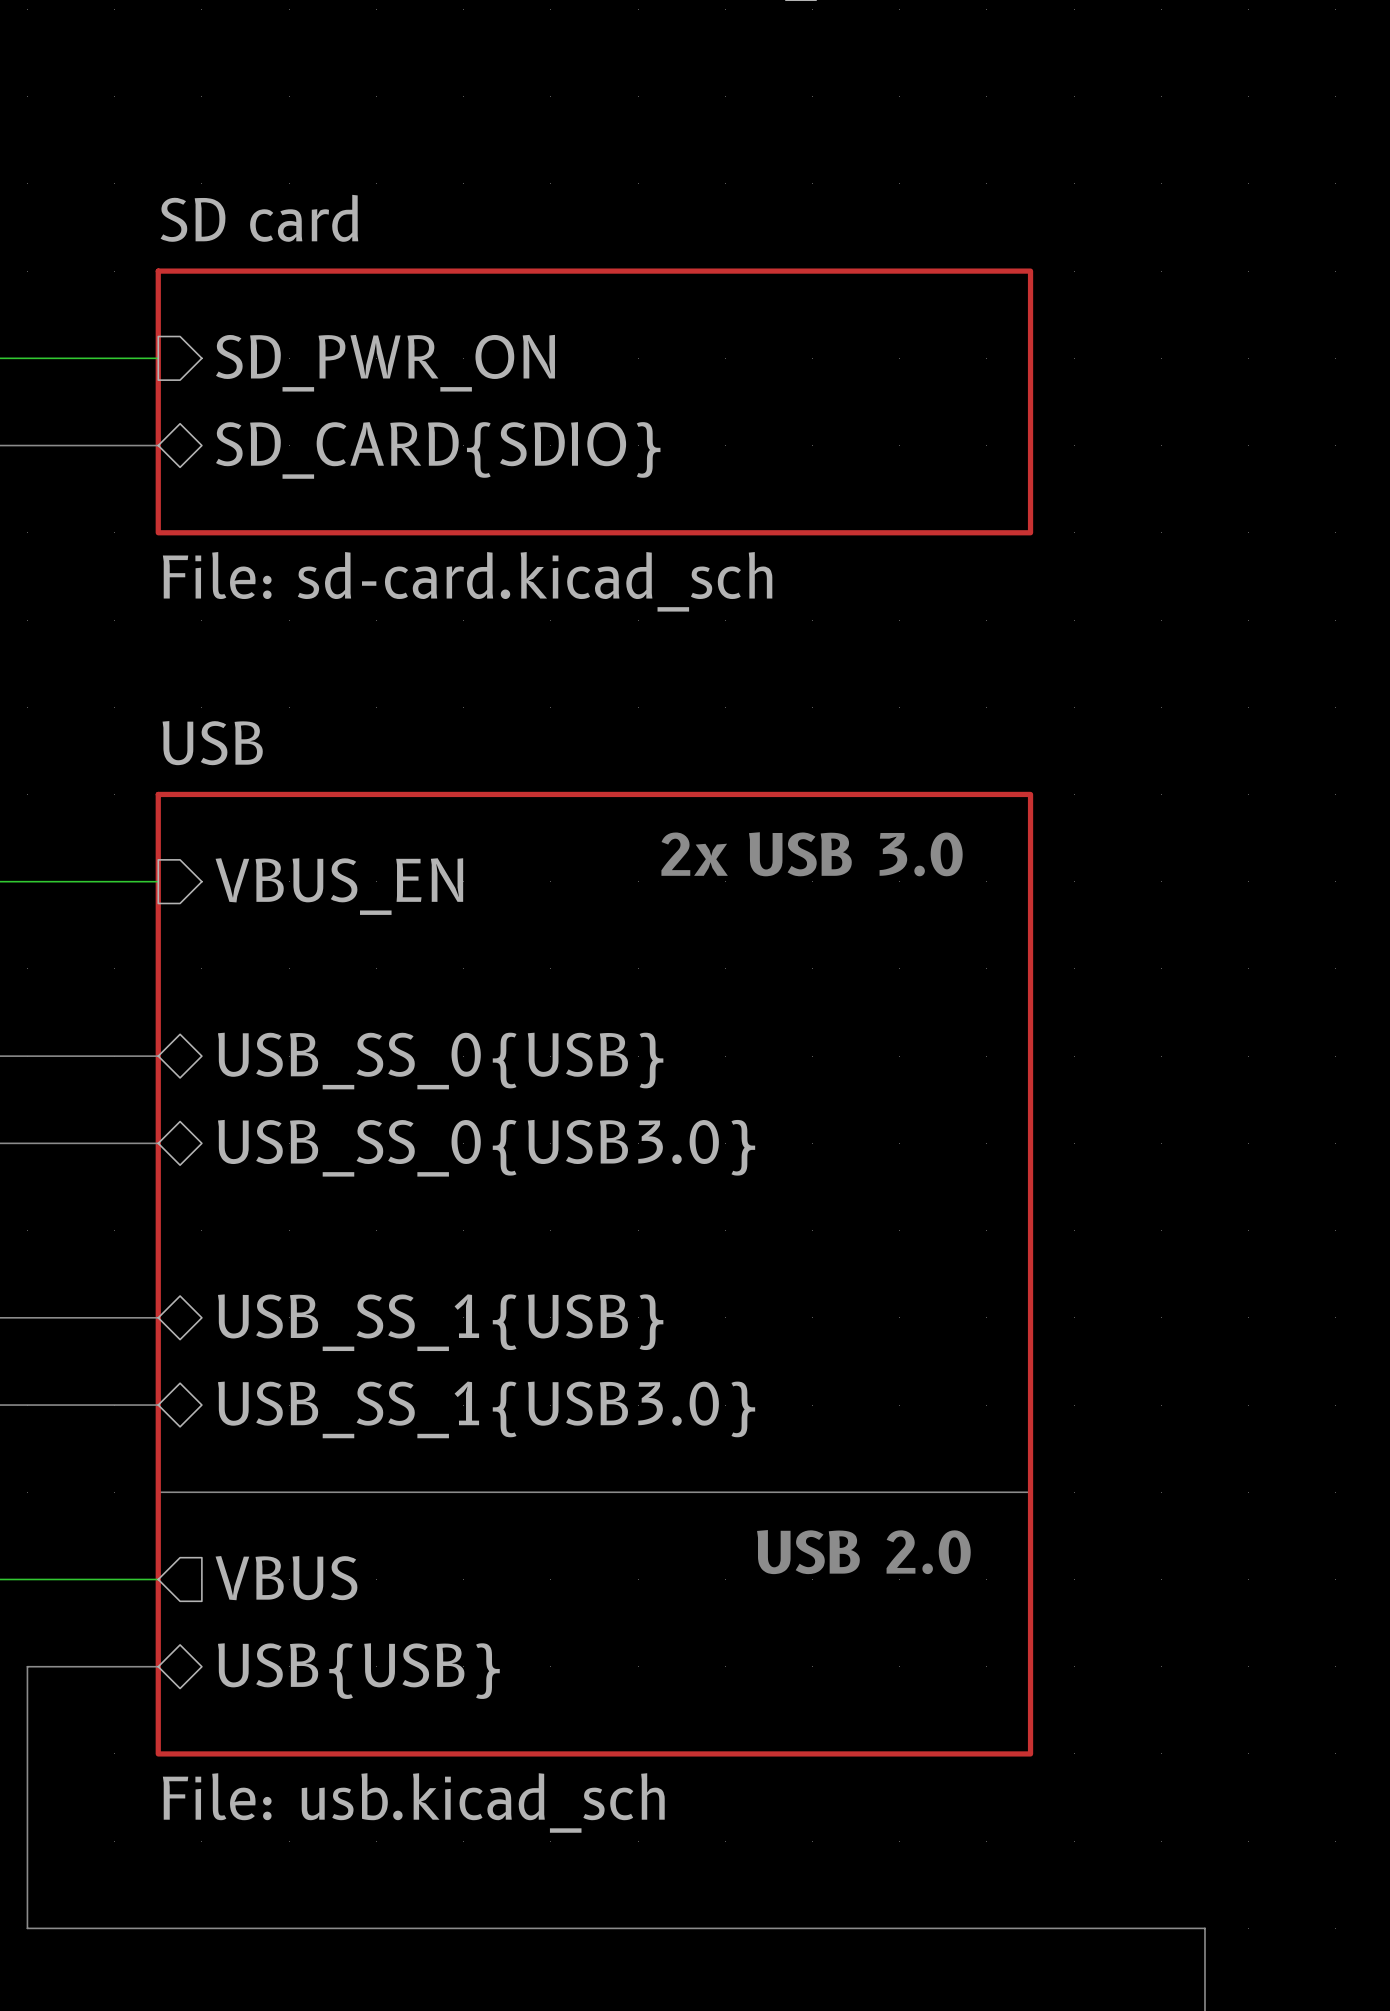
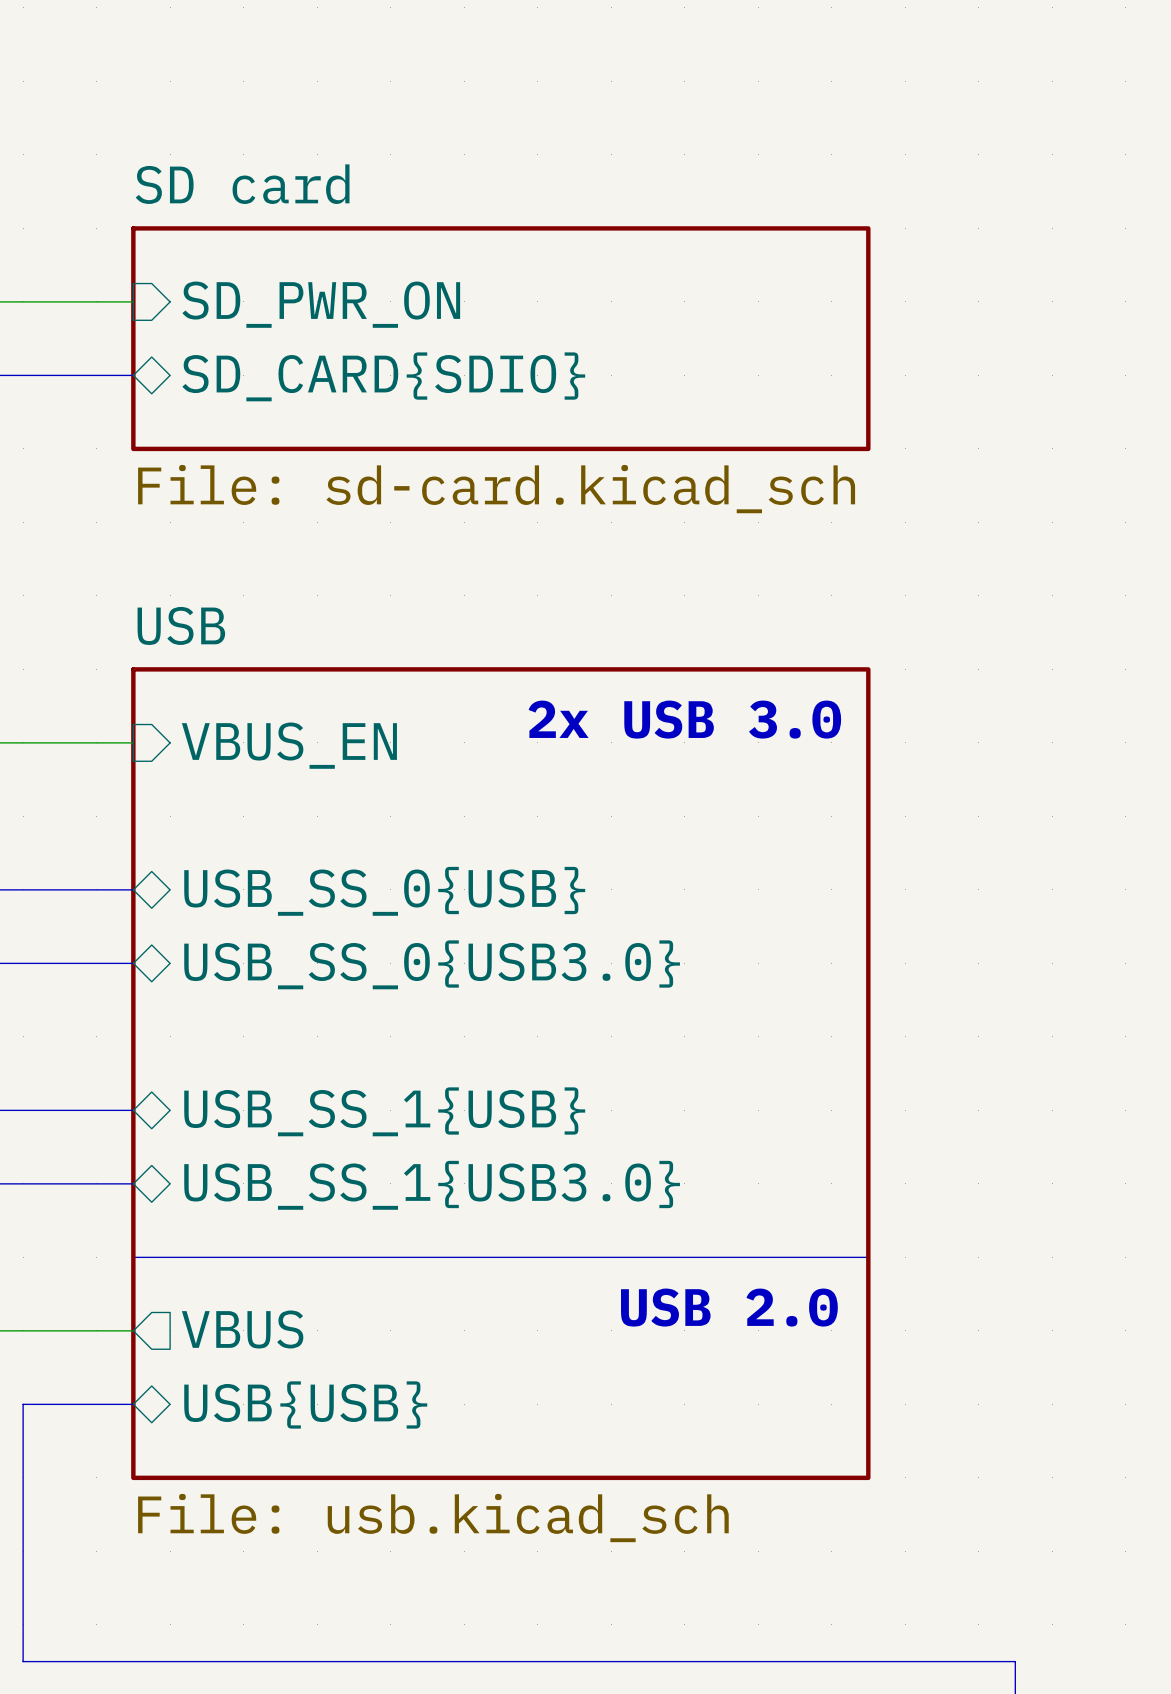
bus: (27, 1928) (1204, 1928) (1204, 1972) -> (23, 1624) (23, 1661) (1015, 1661)

